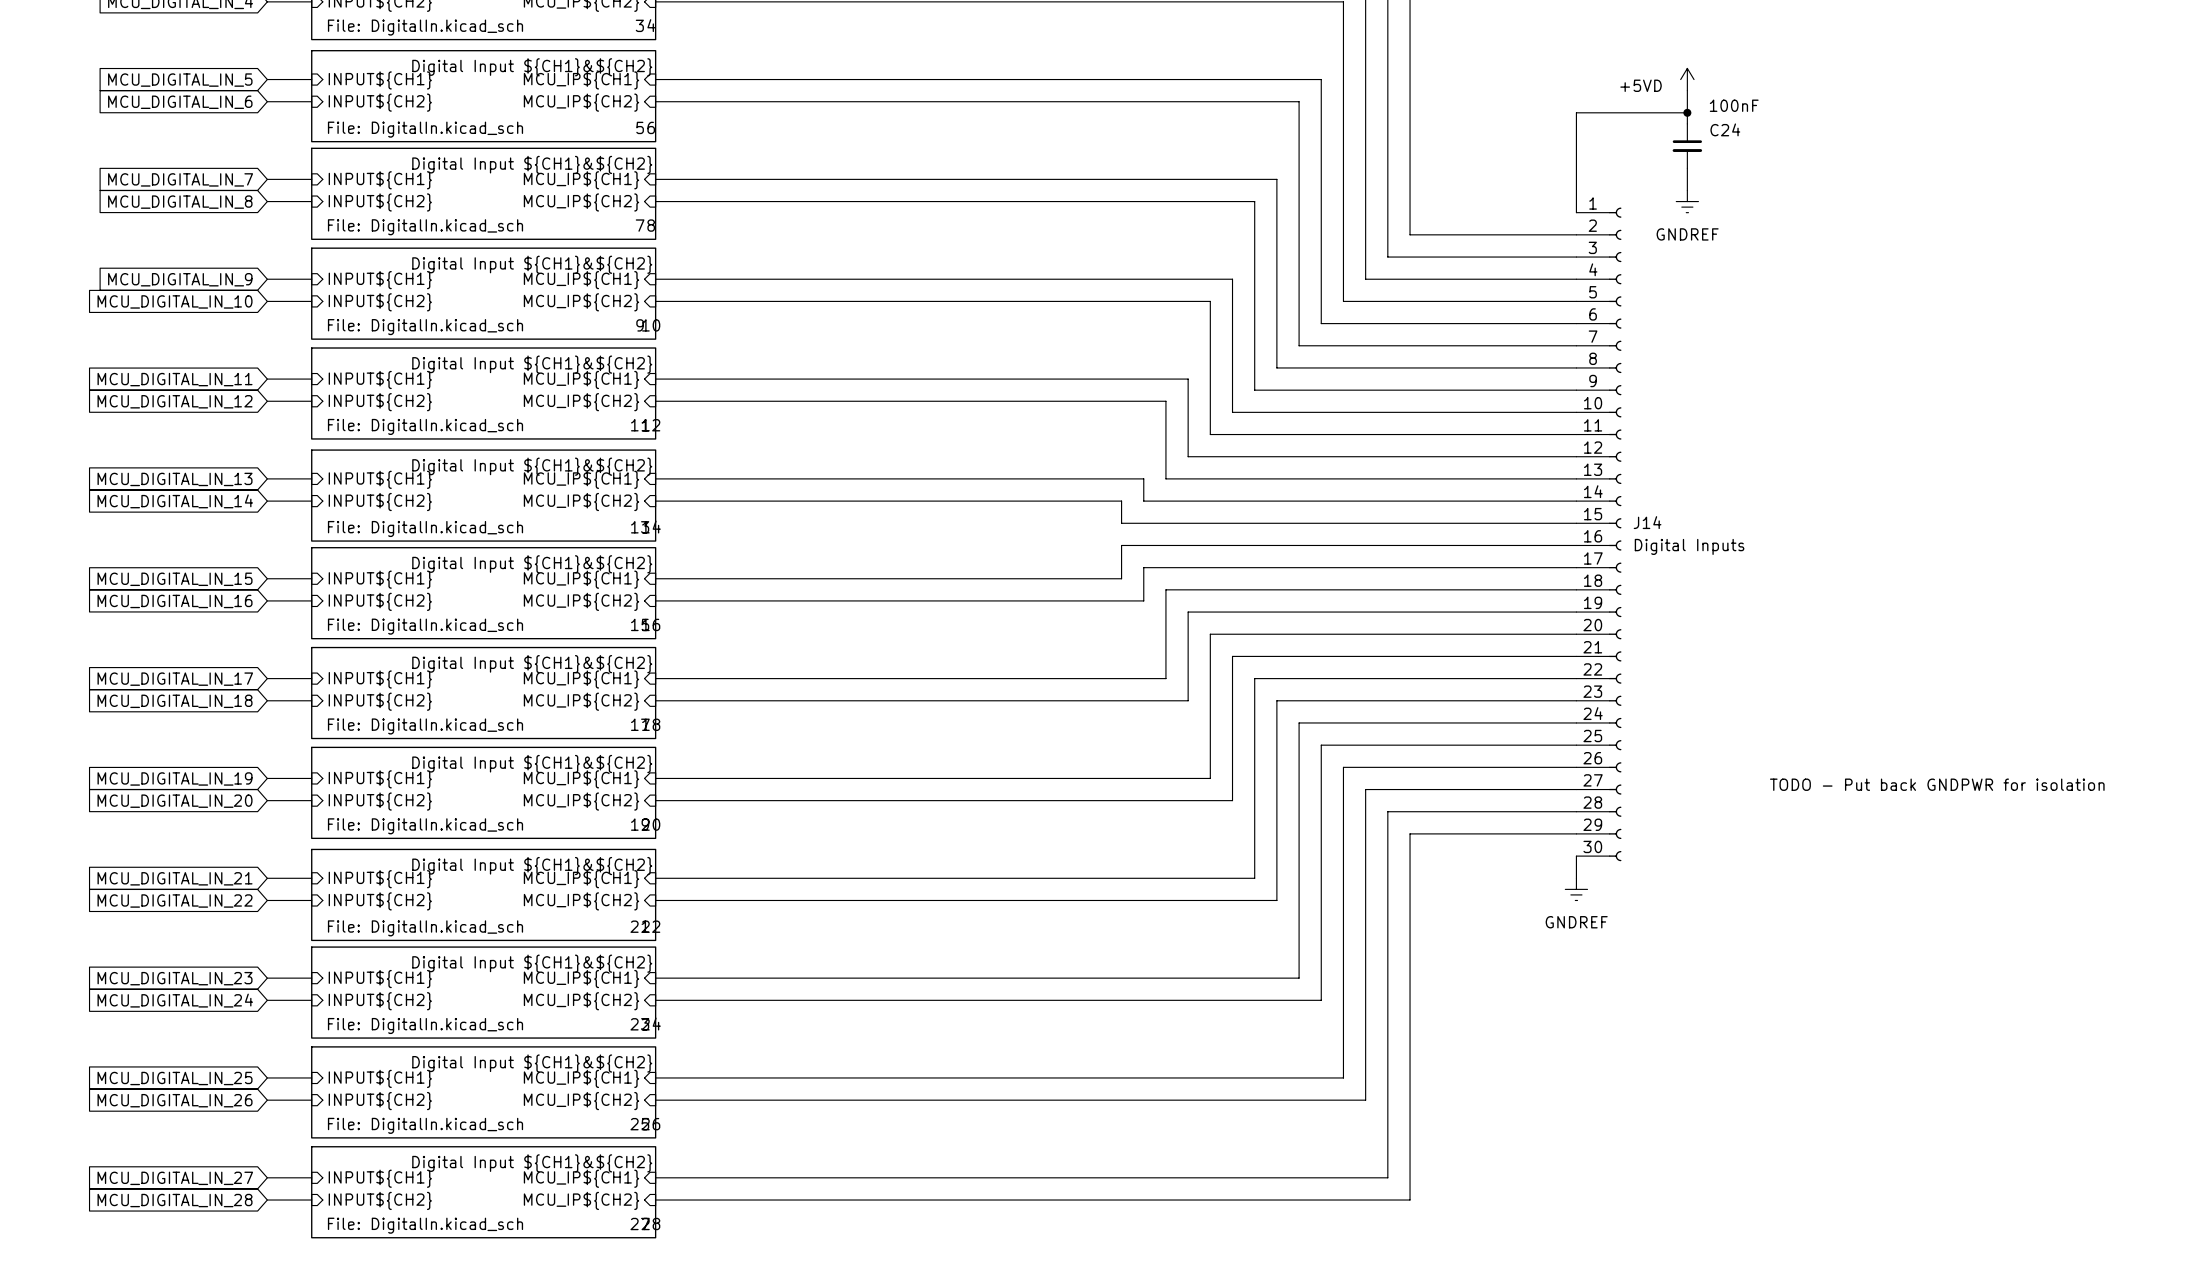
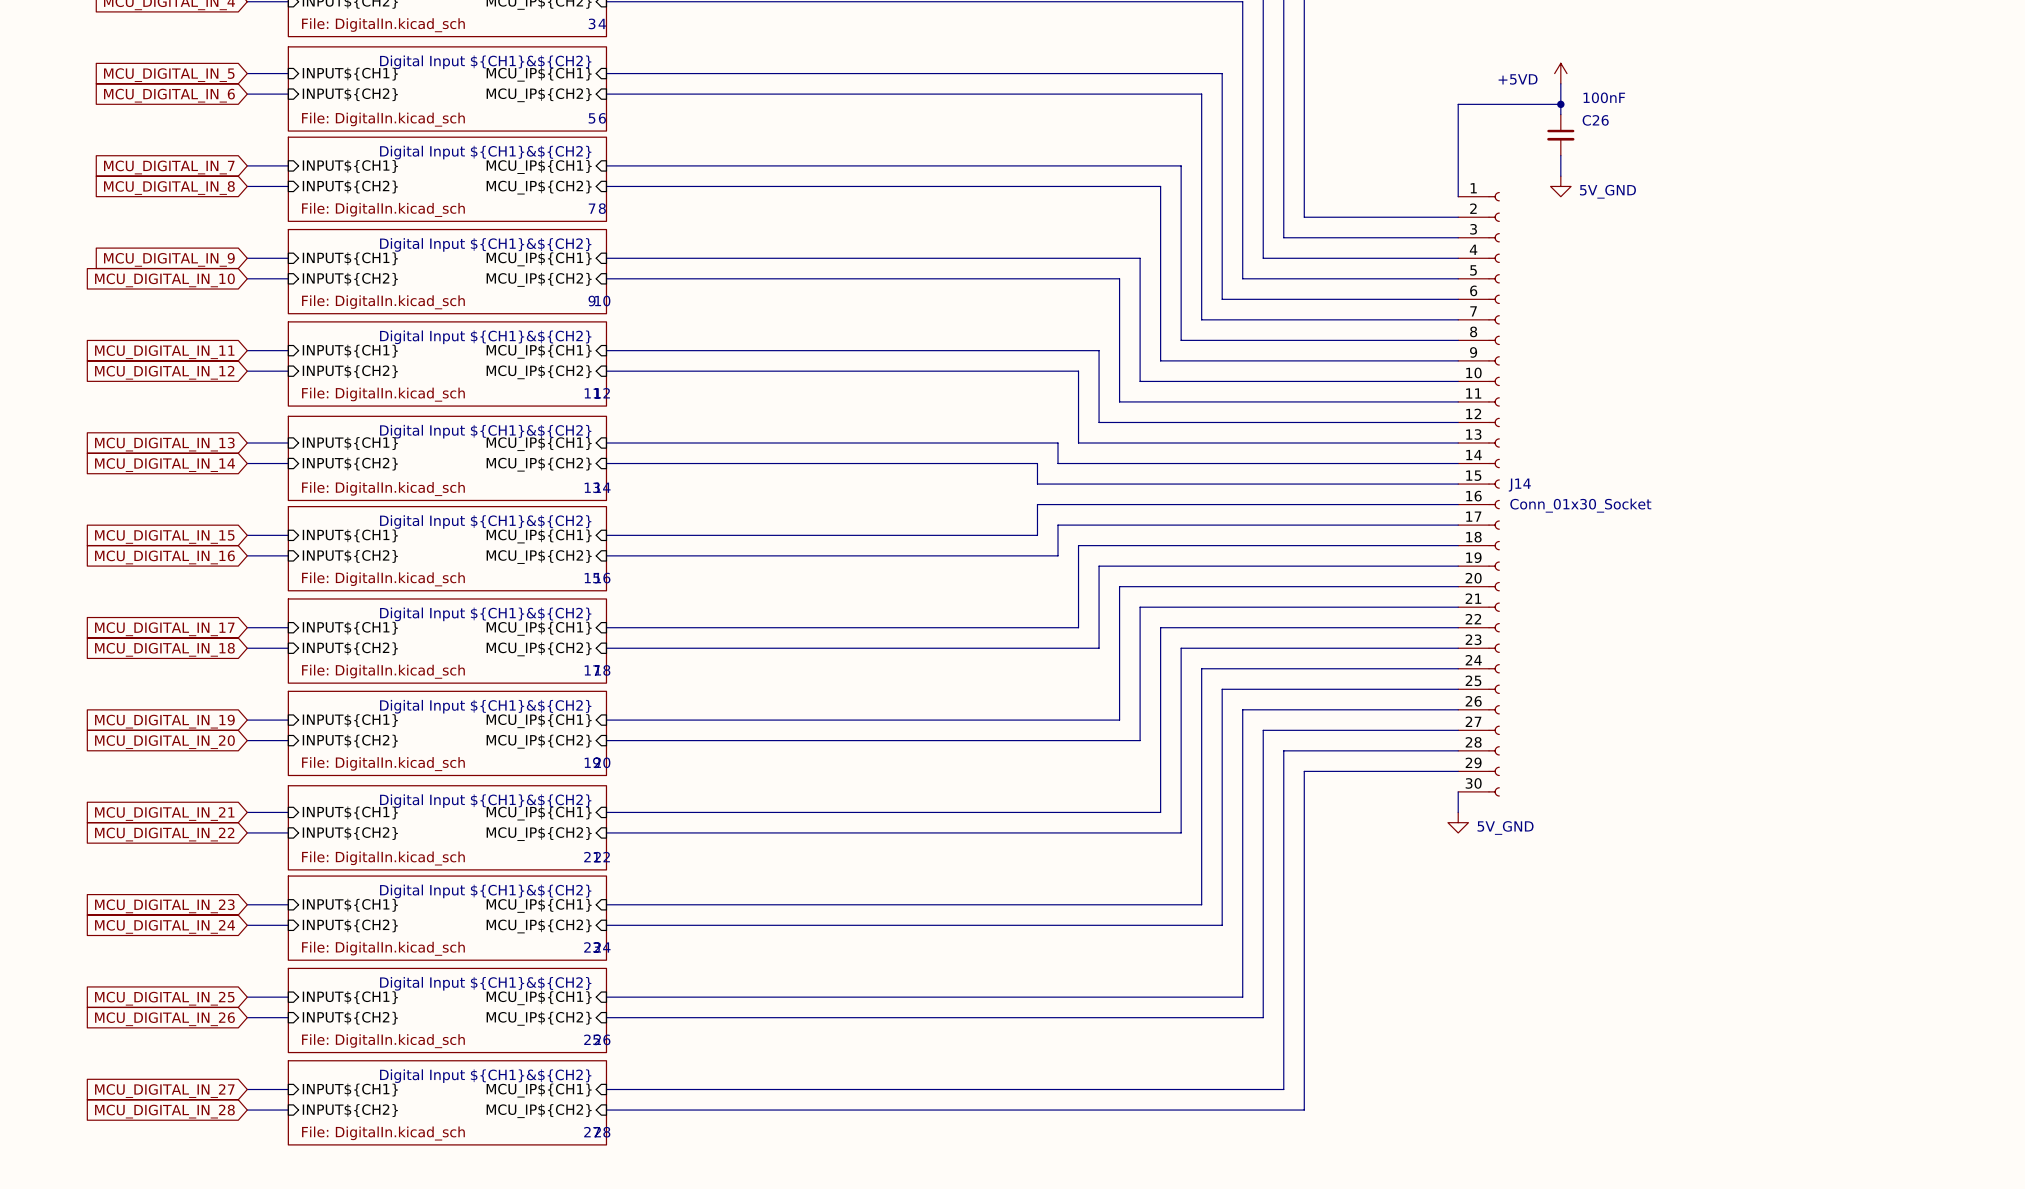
C24 name: C24 (1725, 129) -> C26 (1595, 120)
power symbol: GNDREF (1687, 201) -> 5V_GND (1560, 186)
J14 value: Digital Inputs (1689, 546) -> Conn_01x30_Socket (1580, 505)
text: TODO - Put back GNDPWR for isolation (1937, 784) -> none
power symbol: GNDREF (1576, 889) -> 5V_GND (1458, 822)

